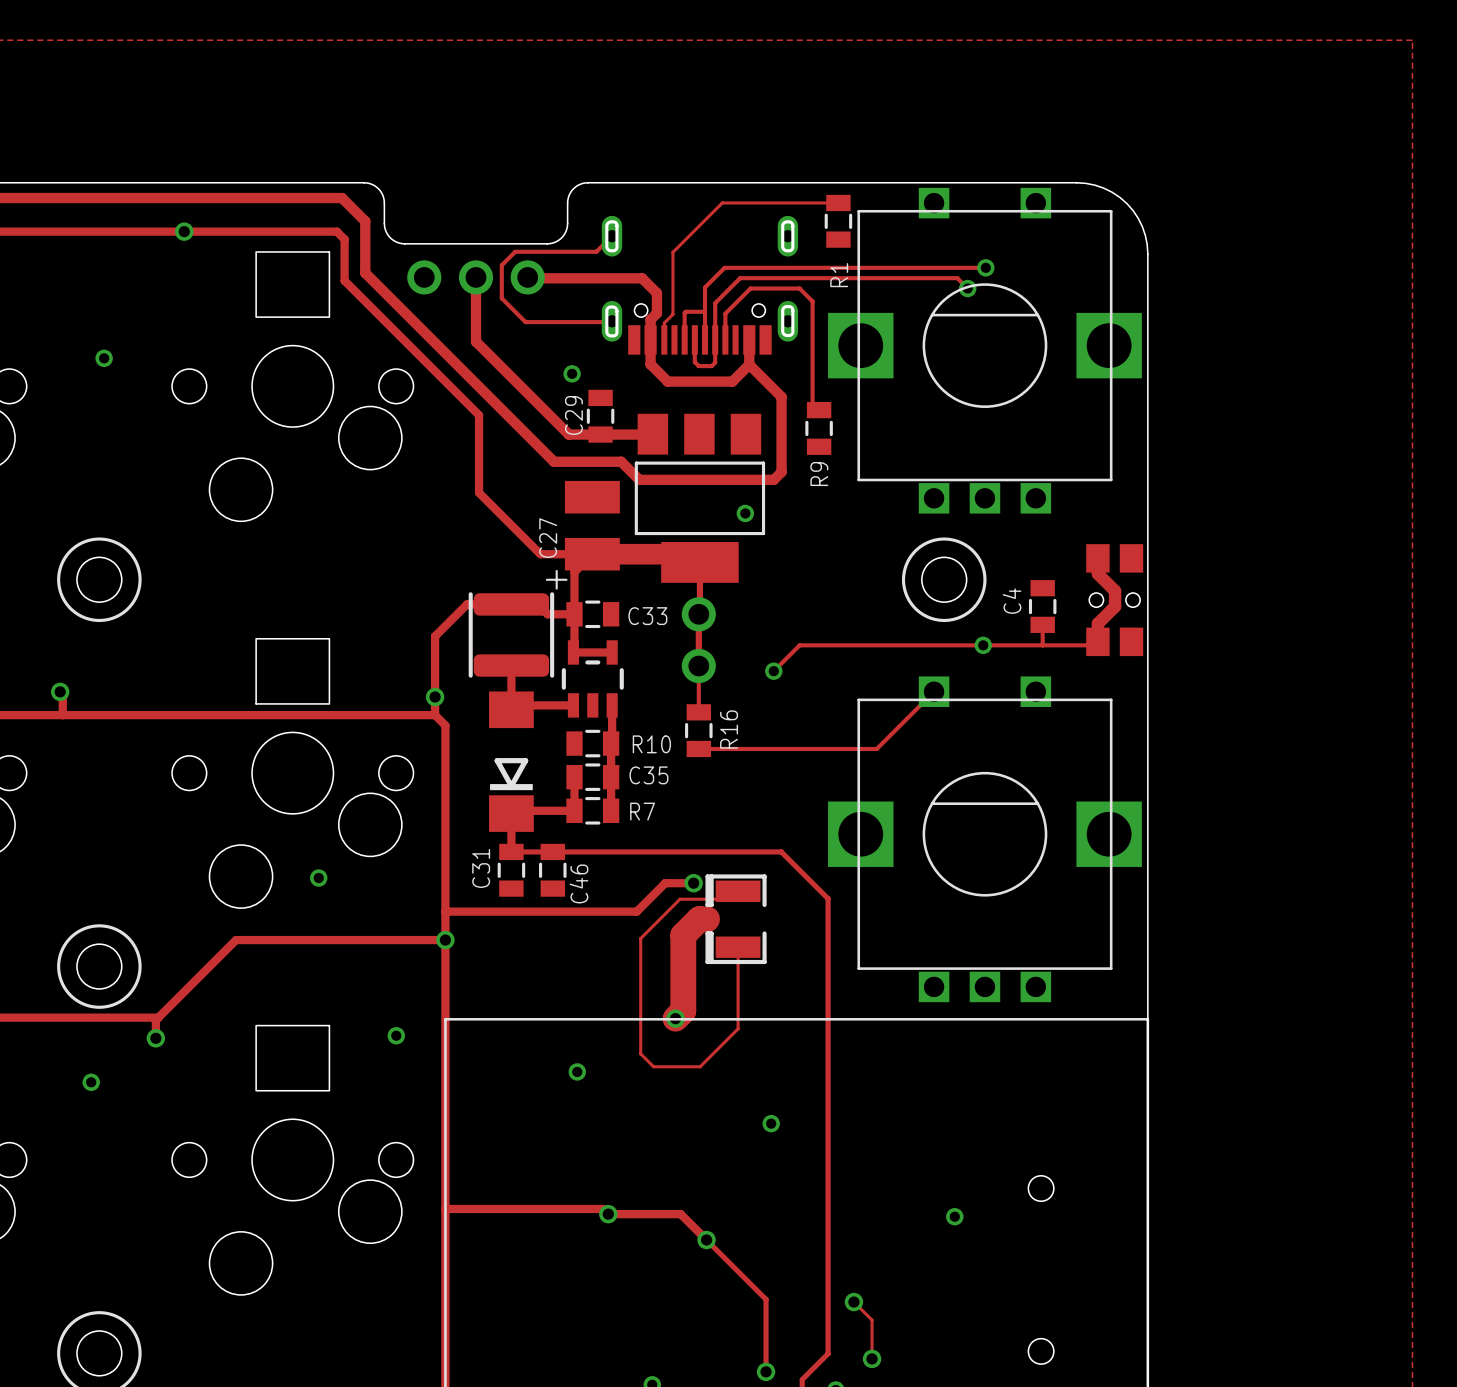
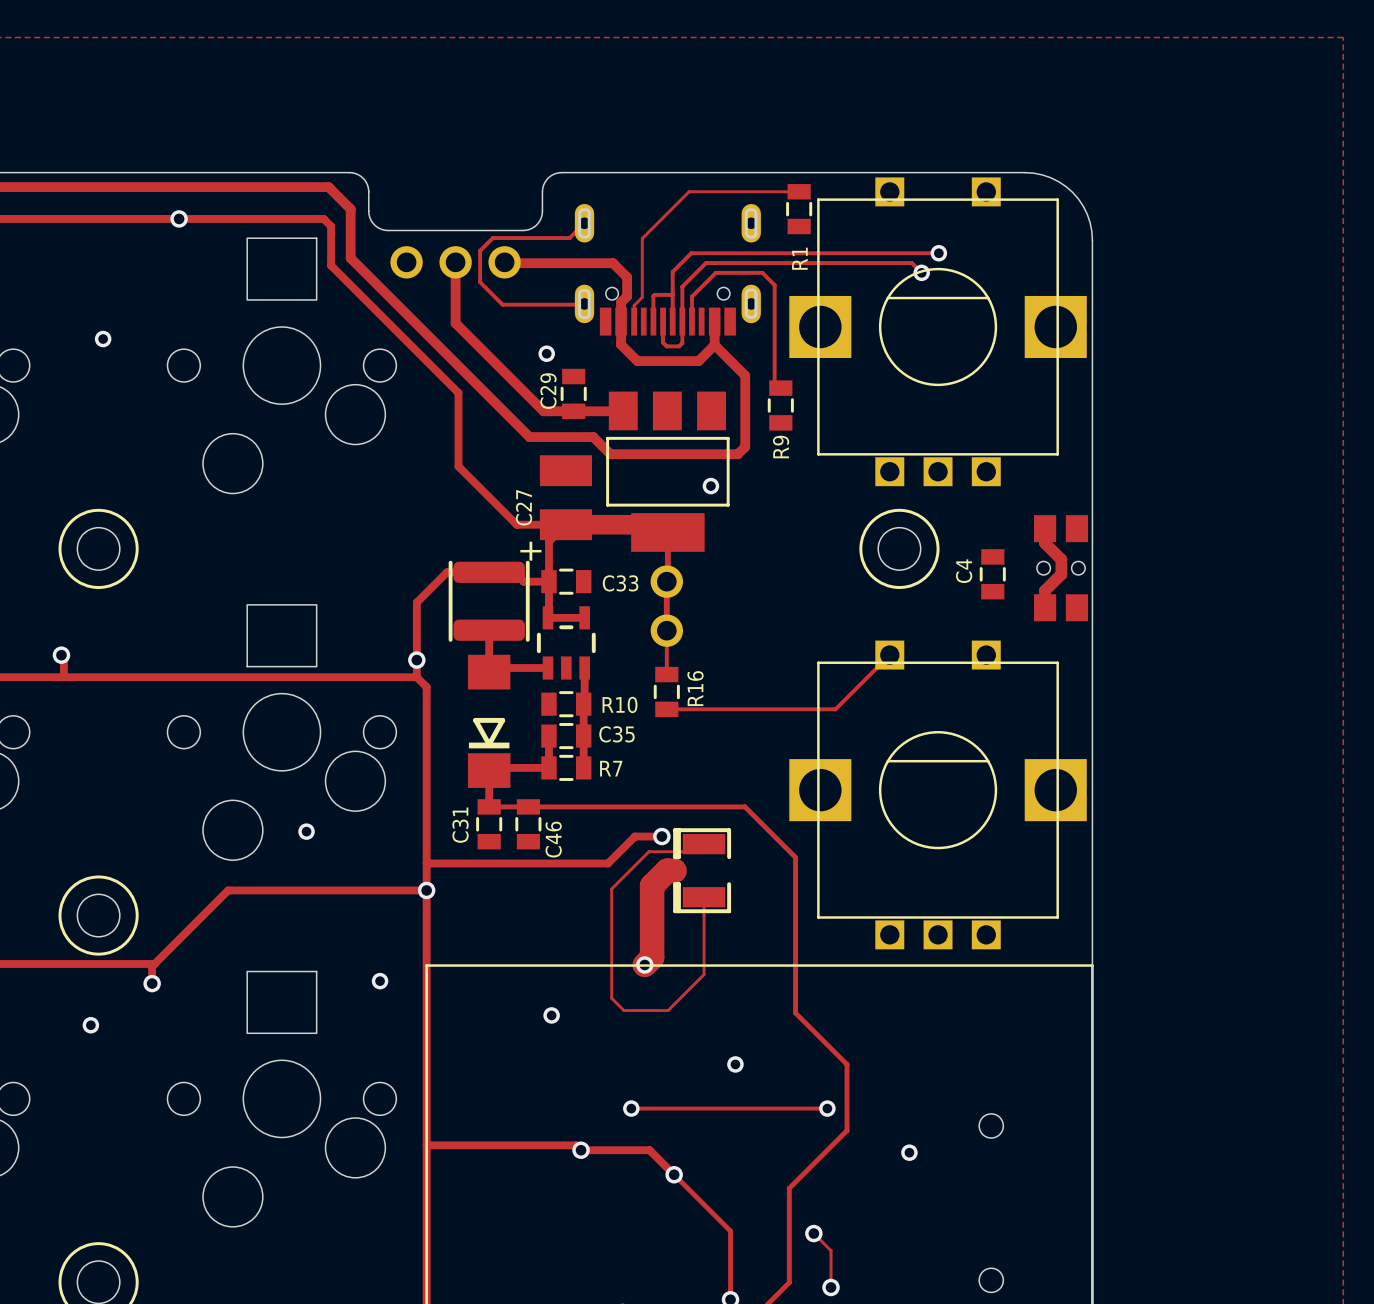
track: (1042, 624) (1042, 645) -> none
track: (1097, 641) (1094, 645) (799, 645) (773, 671) -> none
via: (983, 645) -> none
via: (773, 671) -> none
track: (828, 898) (828, 1254) -> (789, 851) (795, 857) (795, 1012) (847, 1064) (847, 1130) (789, 1188)
track: none -> (631, 1108) (827, 1108)
via: none -> (631, 1108)
via: none -> (827, 1108)

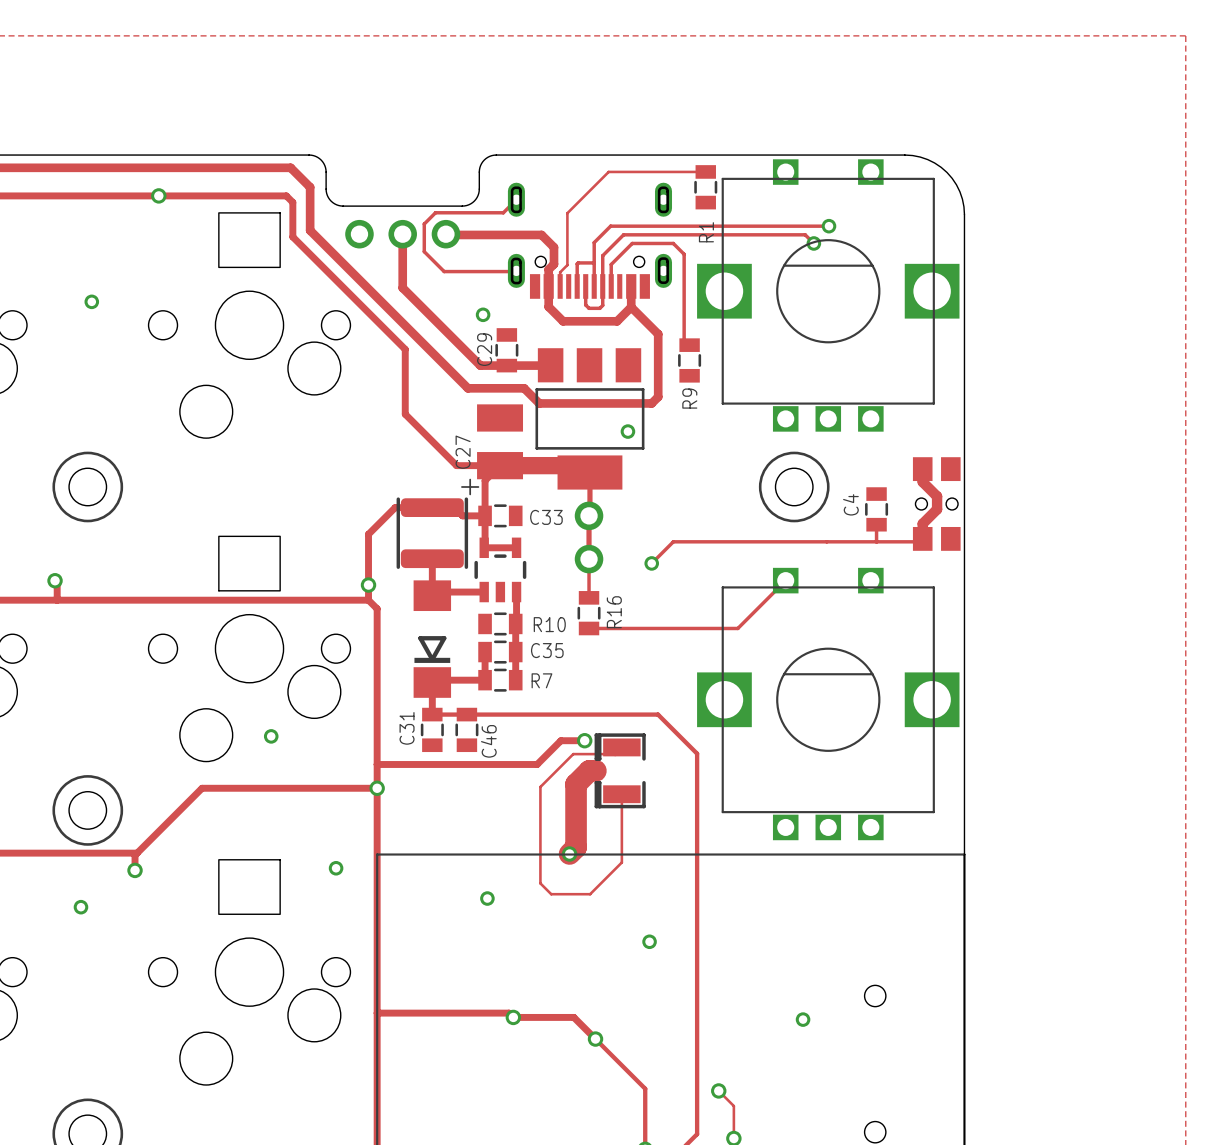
track: none -> (876, 524) (876, 541)
track: none -> (922, 538) (919, 541) (673, 541) (651, 563)
via: none -> (651, 563)
track: (789, 851) (795, 857) (795, 1012) (847, 1064) (847, 1130) (789, 1188) -> (697, 753) (697, 1050)
track: (631, 1108) (827, 1108) -> none
via: (631, 1108) -> none
via: (827, 1108) -> none

